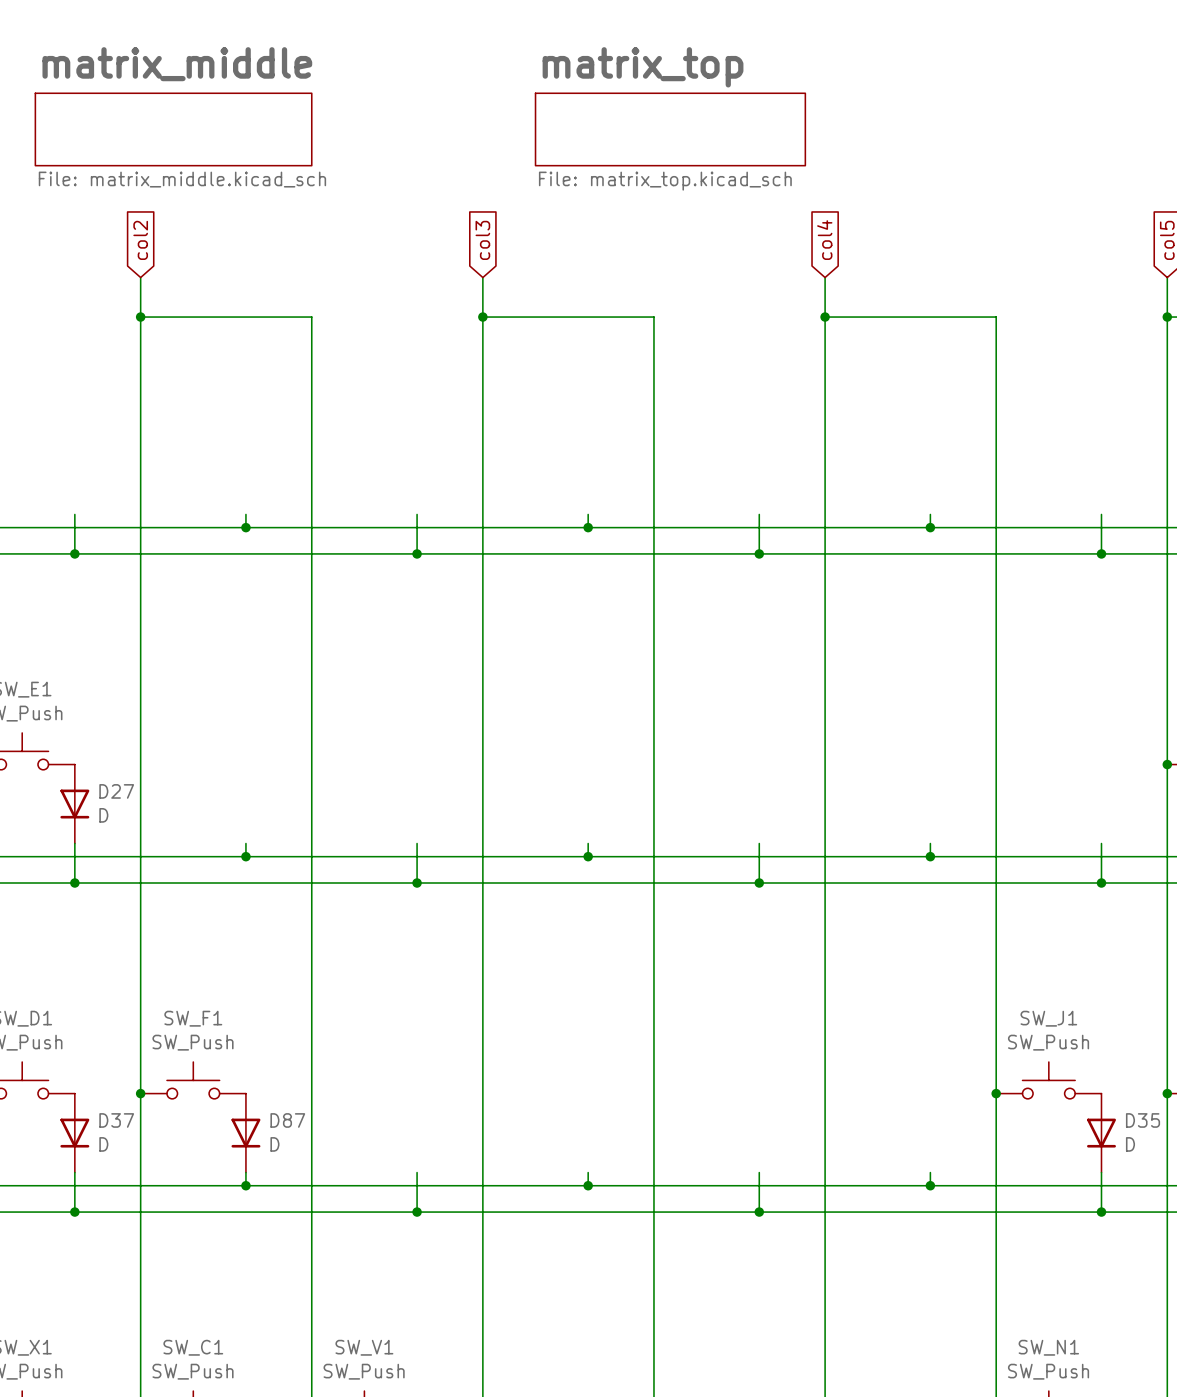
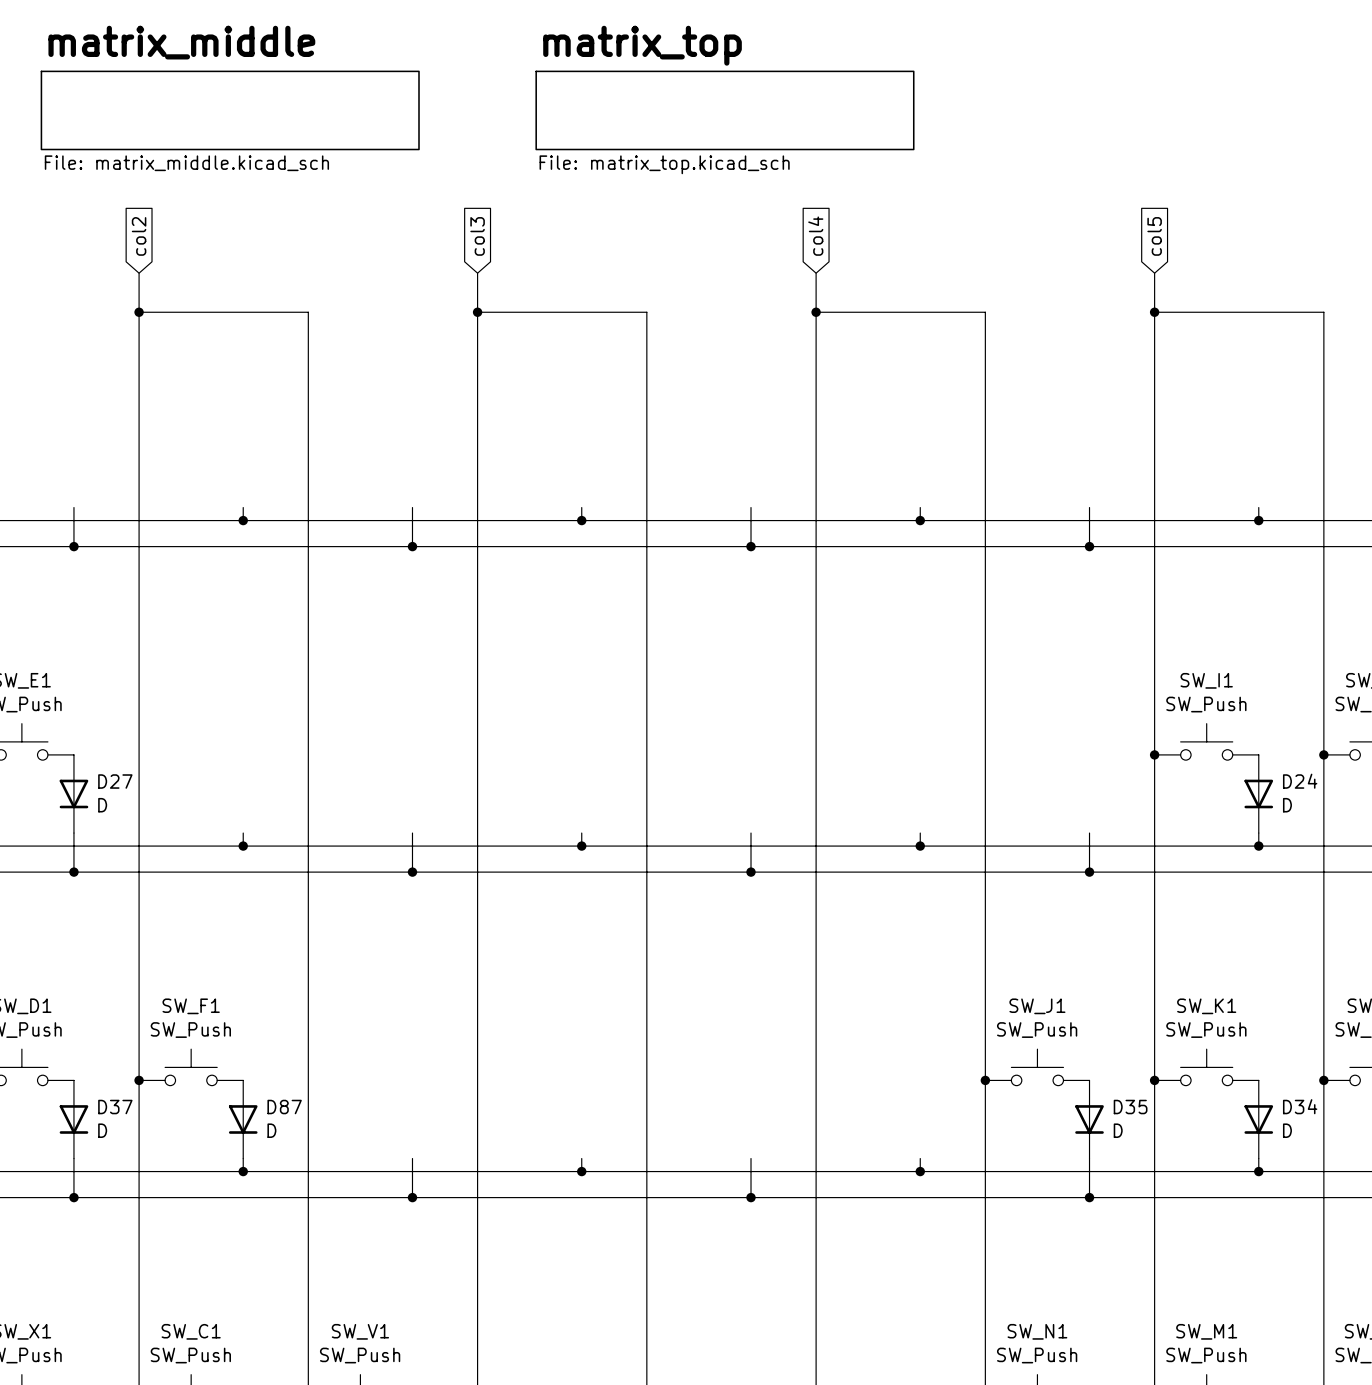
sheet matrix_middle: none -> File: matrix_middle.kicad_sch (230, 110)
sheet matrix_top: none -> File: matrix_top.kicad_sch (724, 110)
sheet matrix_middle: File: matrix_middle.kicad_sch (173, 129) -> none
sheet matrix_top: File: matrix_top.kicad_sch (670, 129) -> none

